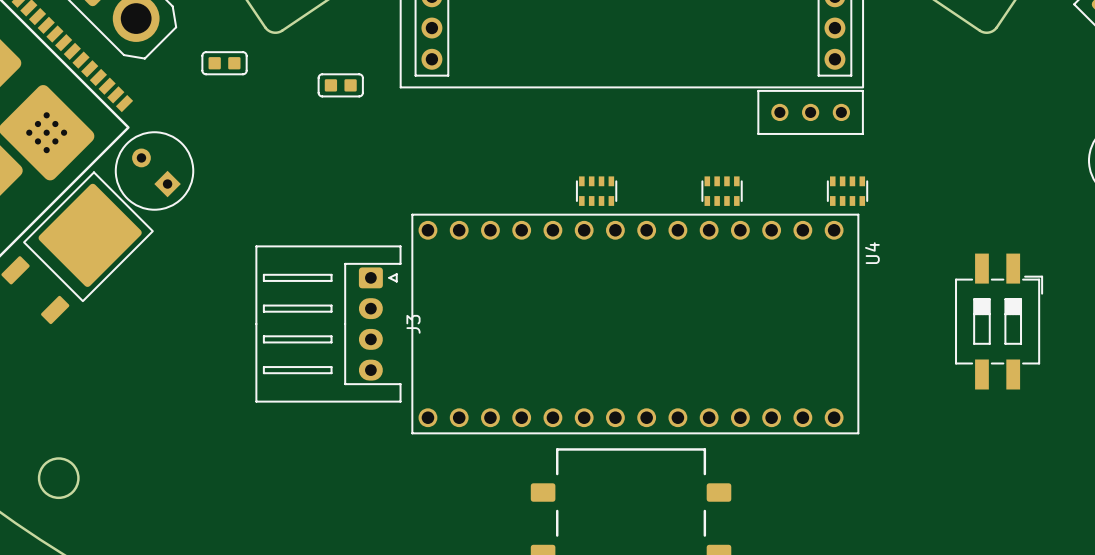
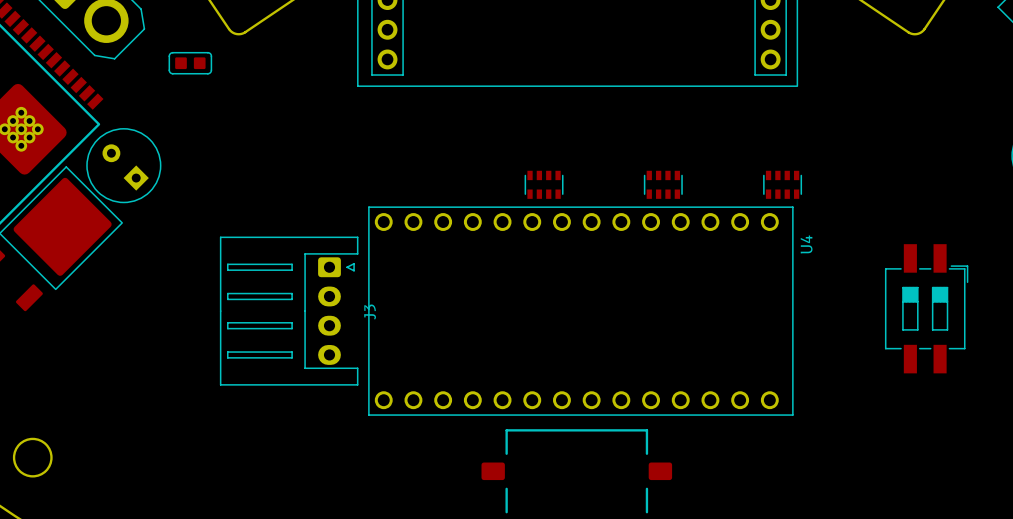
part: (340, 85) -> none
part: (810, 112) -> none

